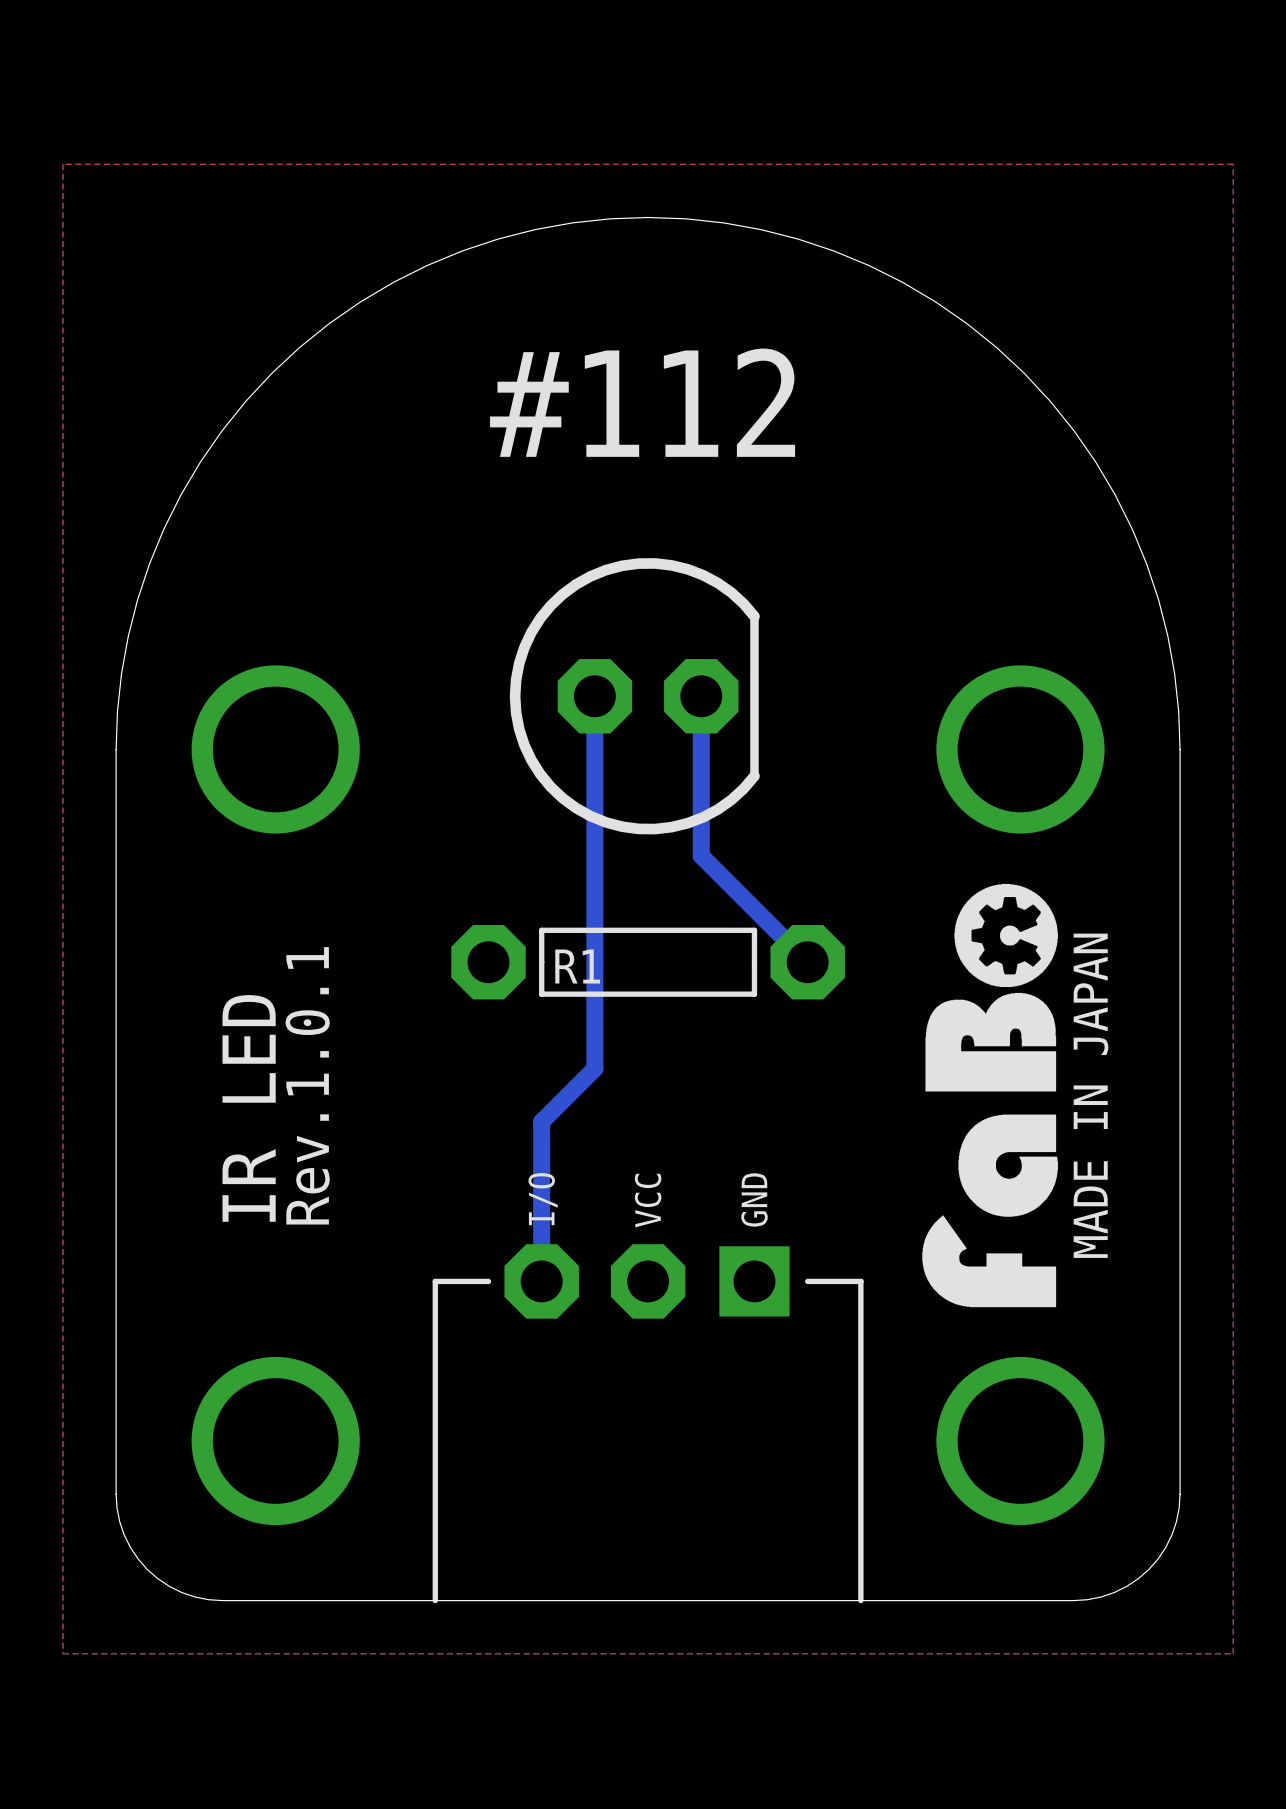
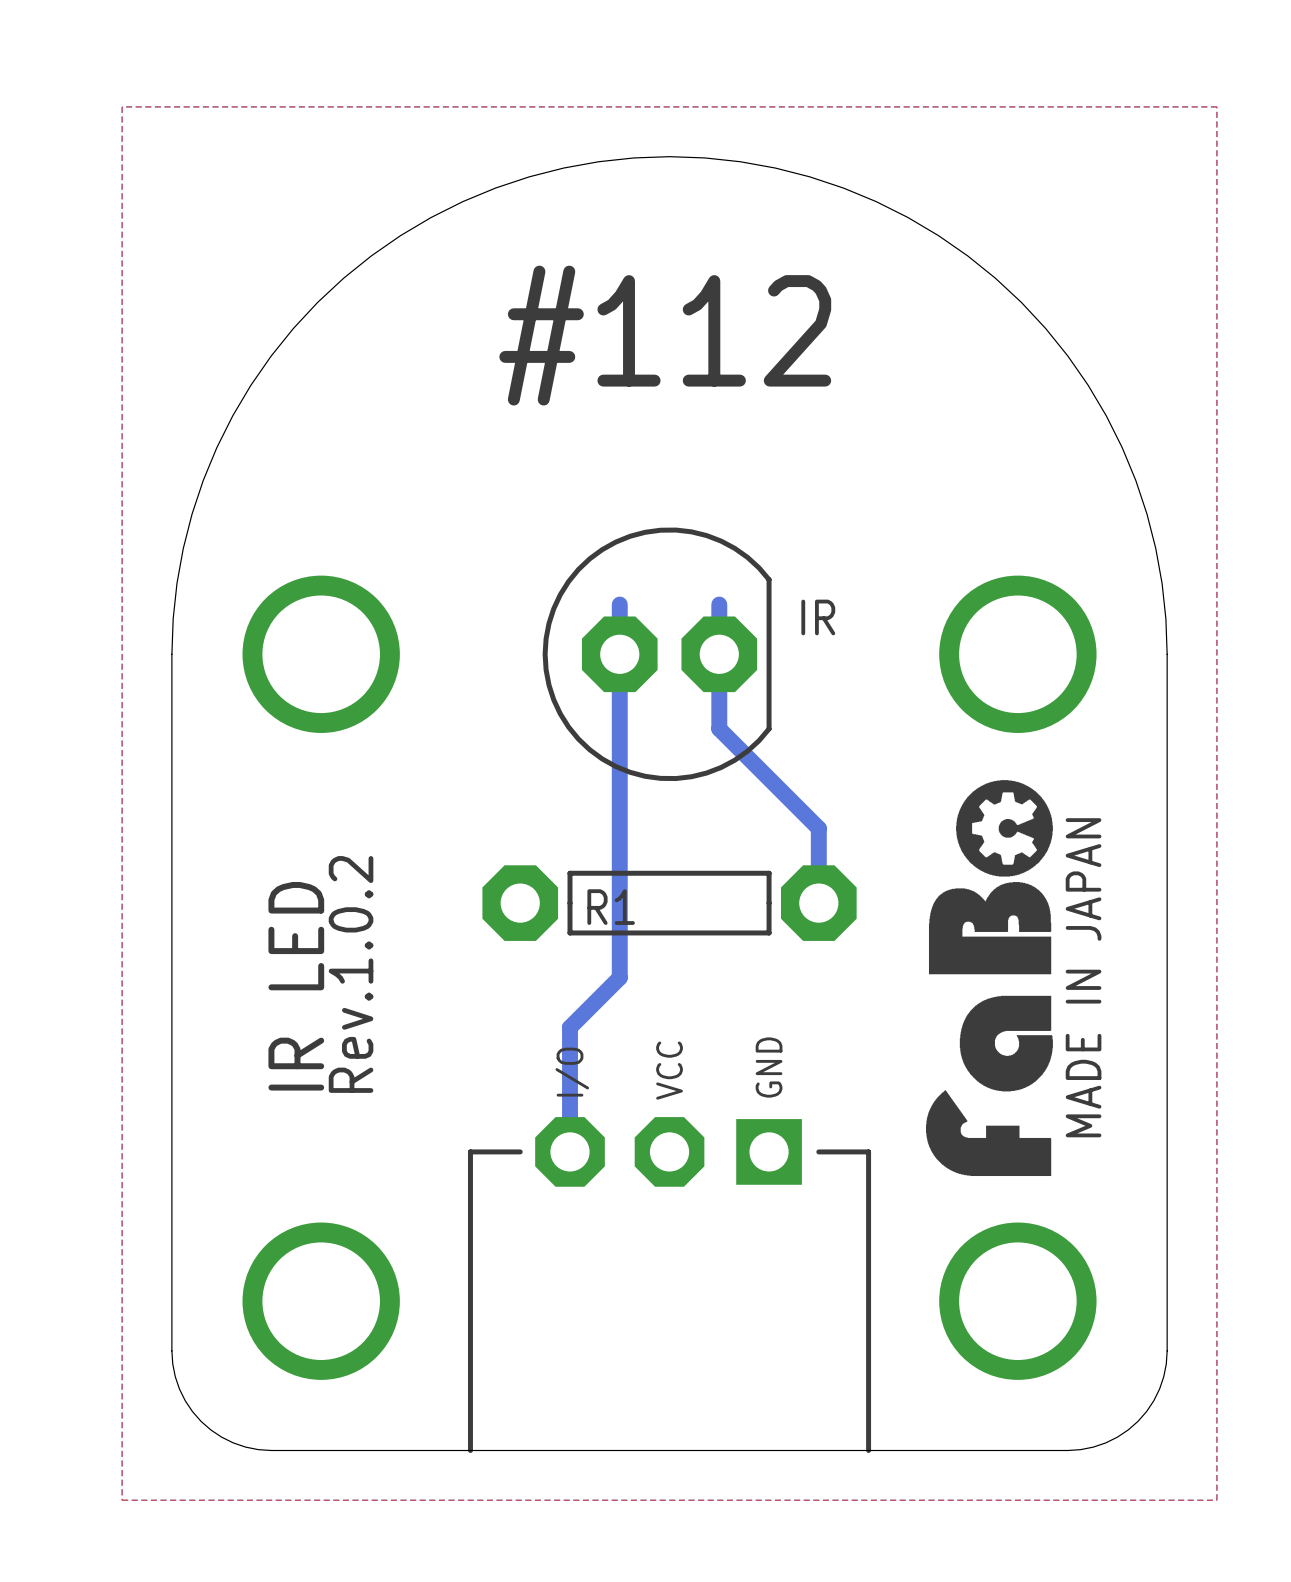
part: (634, 696) -> none
IR: none -> (657, 654)
bottom track: (701, 829) (701, 855) (807, 962) -> (719, 728) (818, 828) (818, 903)
R1 footprint: [451, 925, 845, 1000] -> [482, 865, 857, 941]
bottom track: (594, 1068) (541, 1121) (541, 1148) -> (619, 952) (619, 977) (570, 1027)
text: Rev.1.0.1 (307, 1085) -> Rev.1.0.2 (351, 974)

